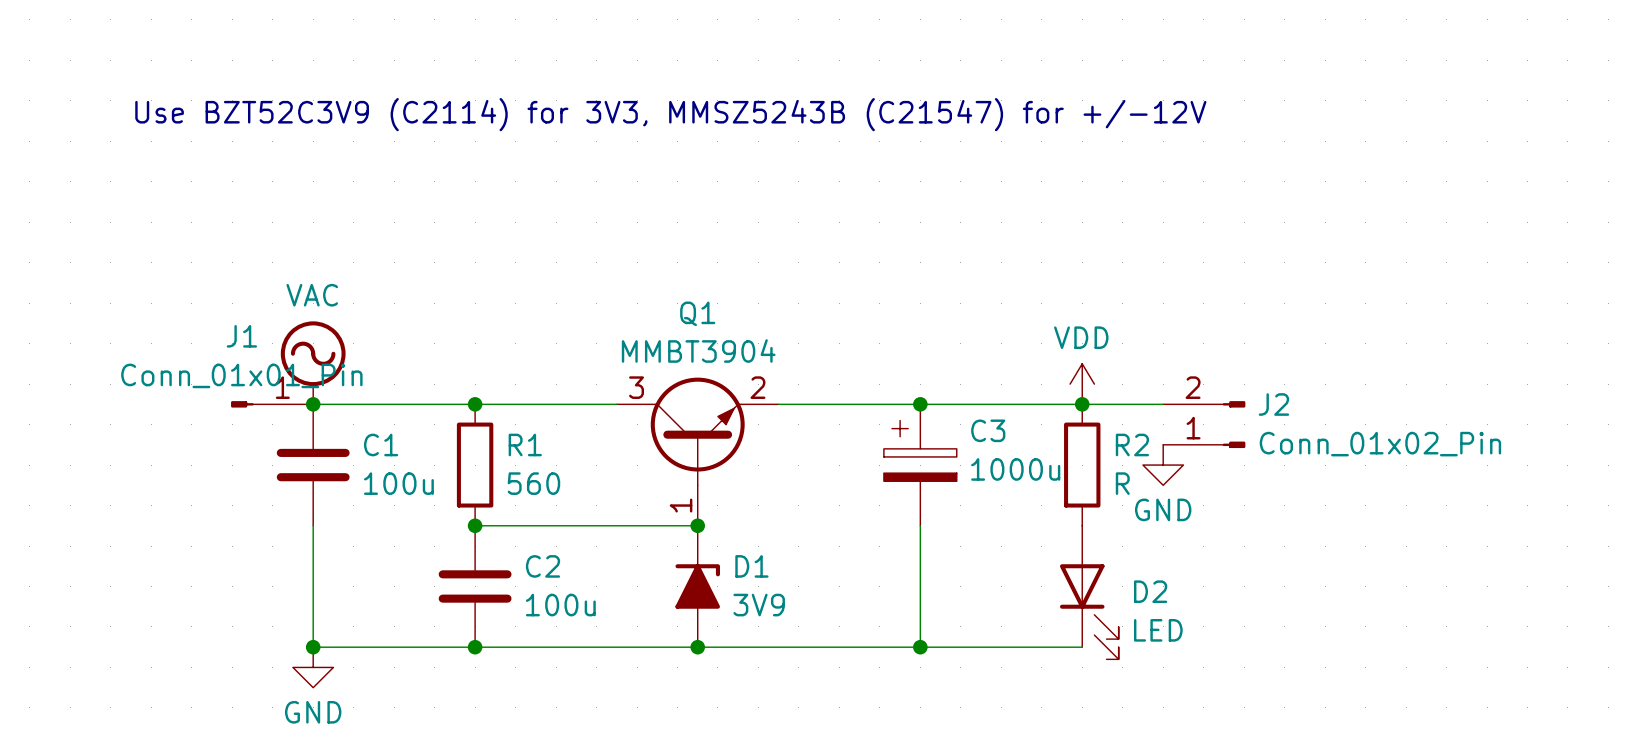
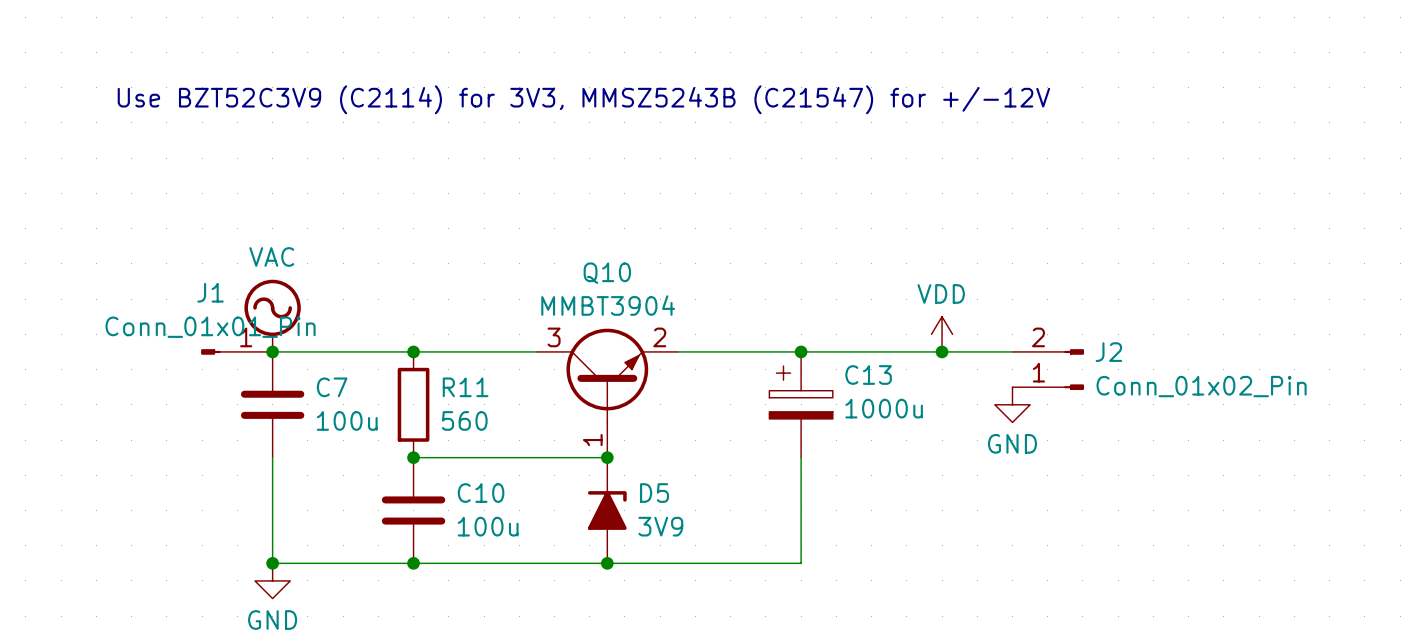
Q1 name: Q1 (697, 313) -> Q10 (607, 273)
C3 name: C3 (988, 430) -> C13 (868, 375)
C1 name: C1 (381, 444) -> C7 (332, 387)
R1 name: R1 (525, 444) -> R11 (465, 387)
R2: R (1082, 465) -> none
C2 name: C2 (543, 566) -> C10 (481, 493)
D1 name: D1 (751, 566) -> D5 (654, 493)
D2: LED (1089, 592) -> none
wire: (920, 647) (1082, 647) -> none
junction: (920, 647) -> none

